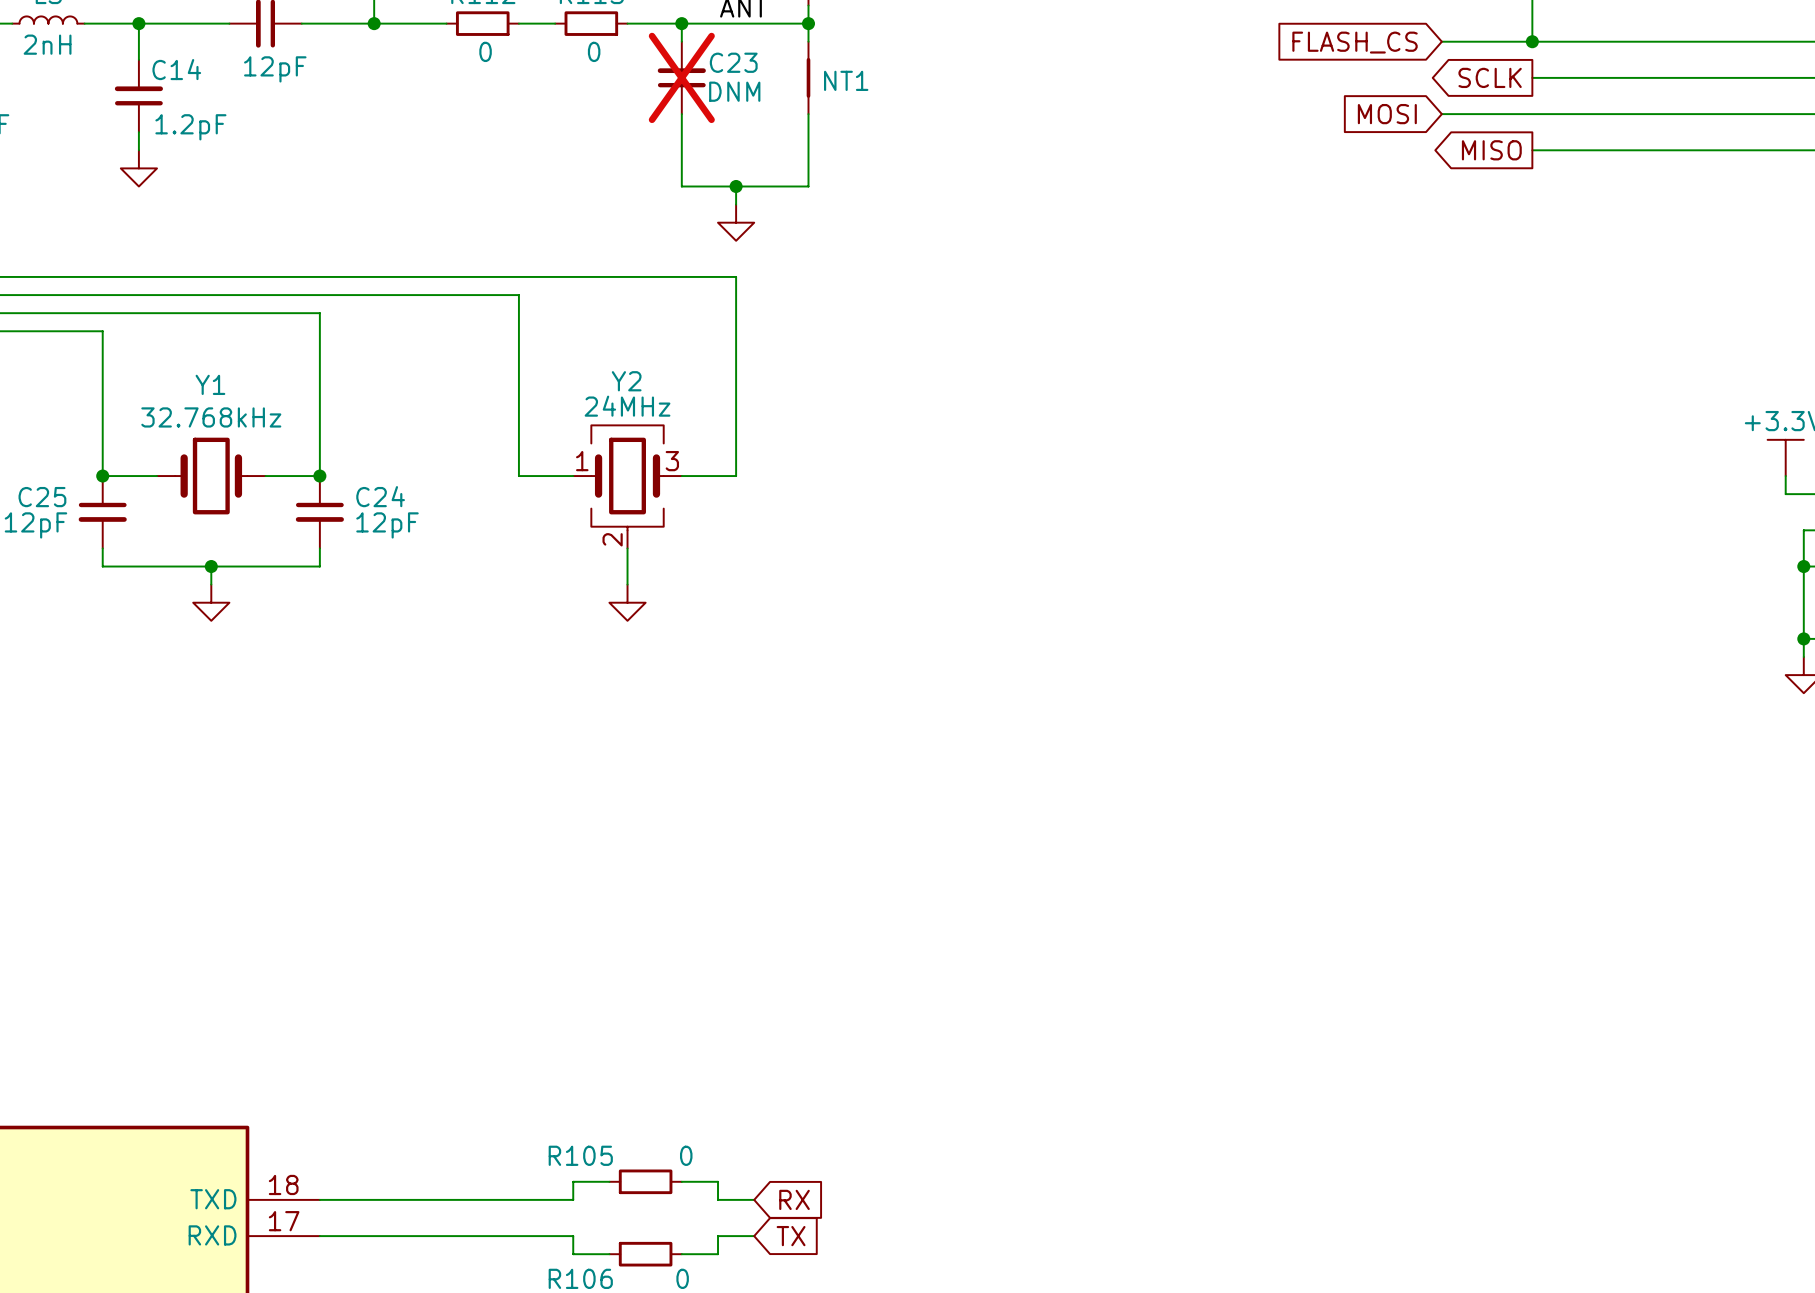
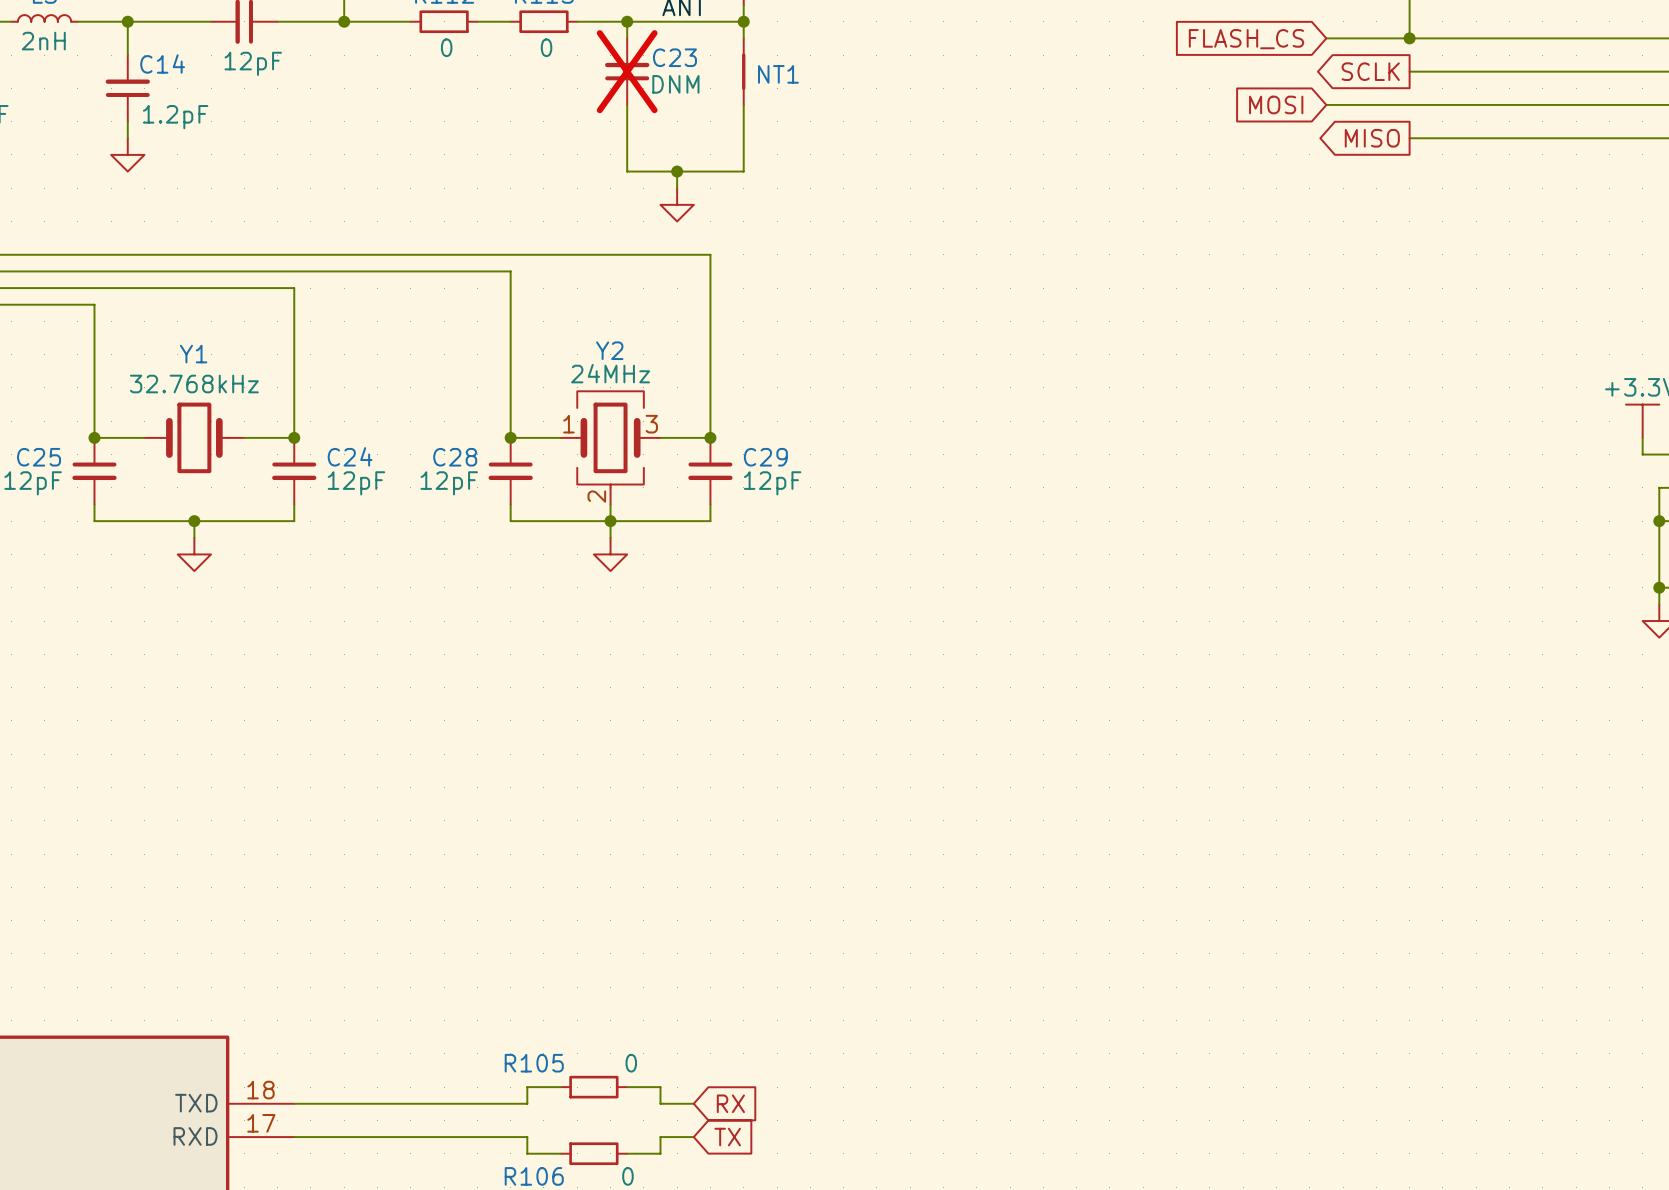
wire: (736, 276) (736, 476) -> (677, 254) (710, 254) (710, 437) (677, 437)
wire: (518, 295) (518, 476) (555, 476) -> (477, 271) (510, 271) (510, 437)
junction: none -> (510, 437)
junction: none -> (710, 437)
Y2 position: (627, 486) -> (610, 447)
C28: none -> 12pF (510, 471)
C29: none -> 12pF (710, 471)
wire: none -> (510, 504) (510, 521) (710, 521) (710, 504)
wire: (627, 548) (627, 584) -> (610, 504) (610, 537)
junction: none -> (610, 521)
power symbol position: (627, 602) -> (610, 554)

